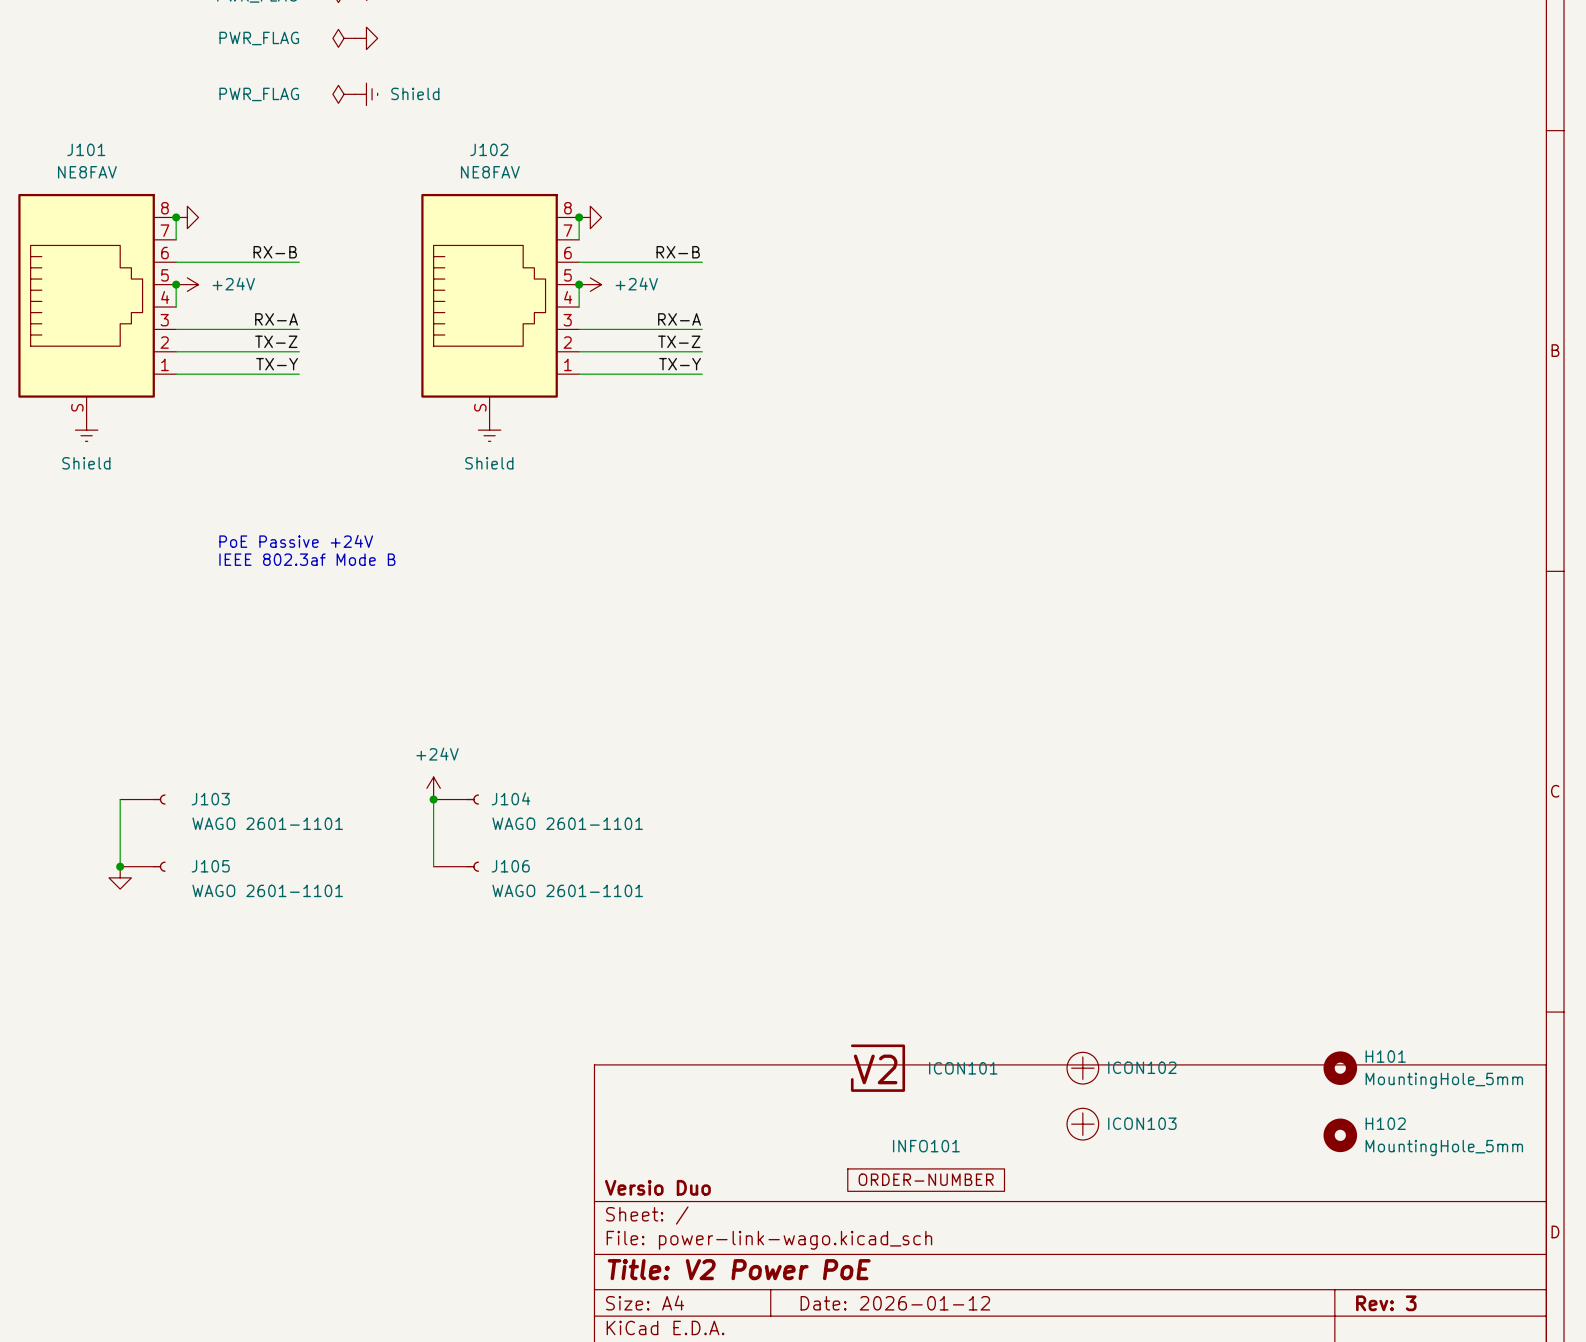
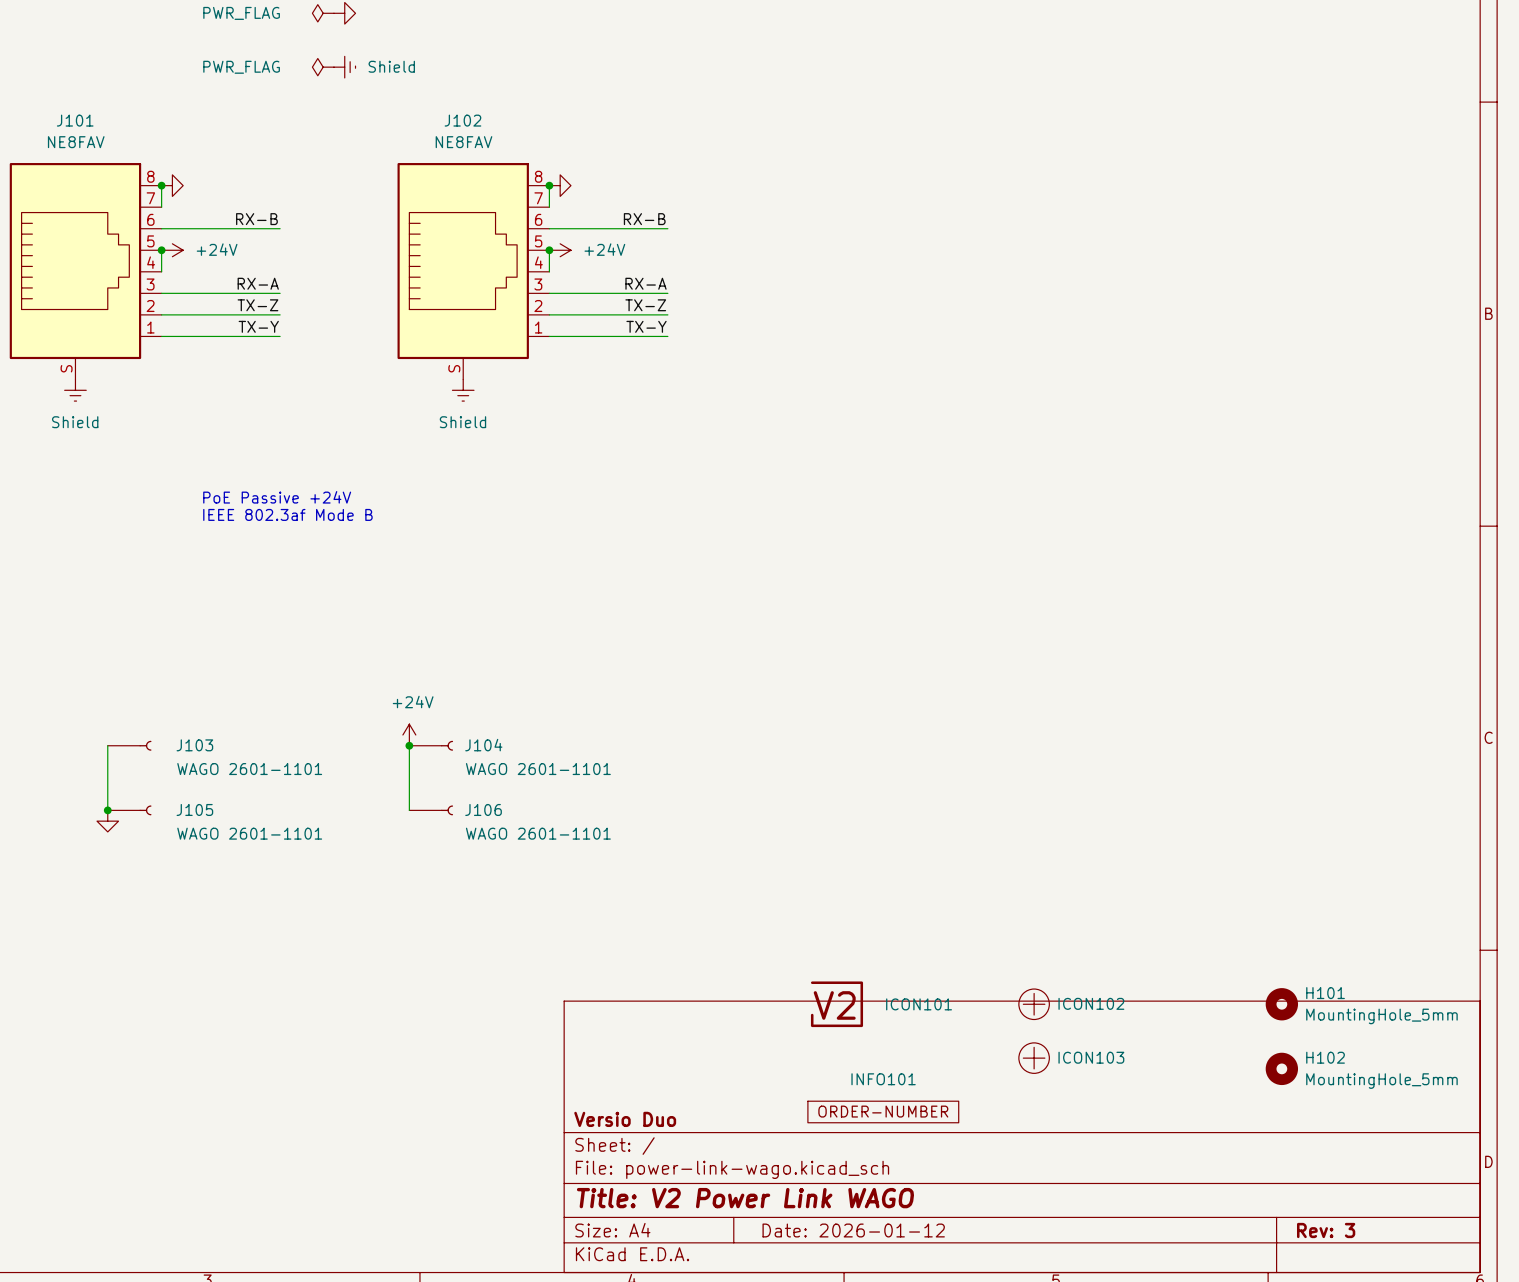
title block: Title: V2 Power PoE (739, 1269) -> Title: V2 Power Link WAGO (745, 1198)

